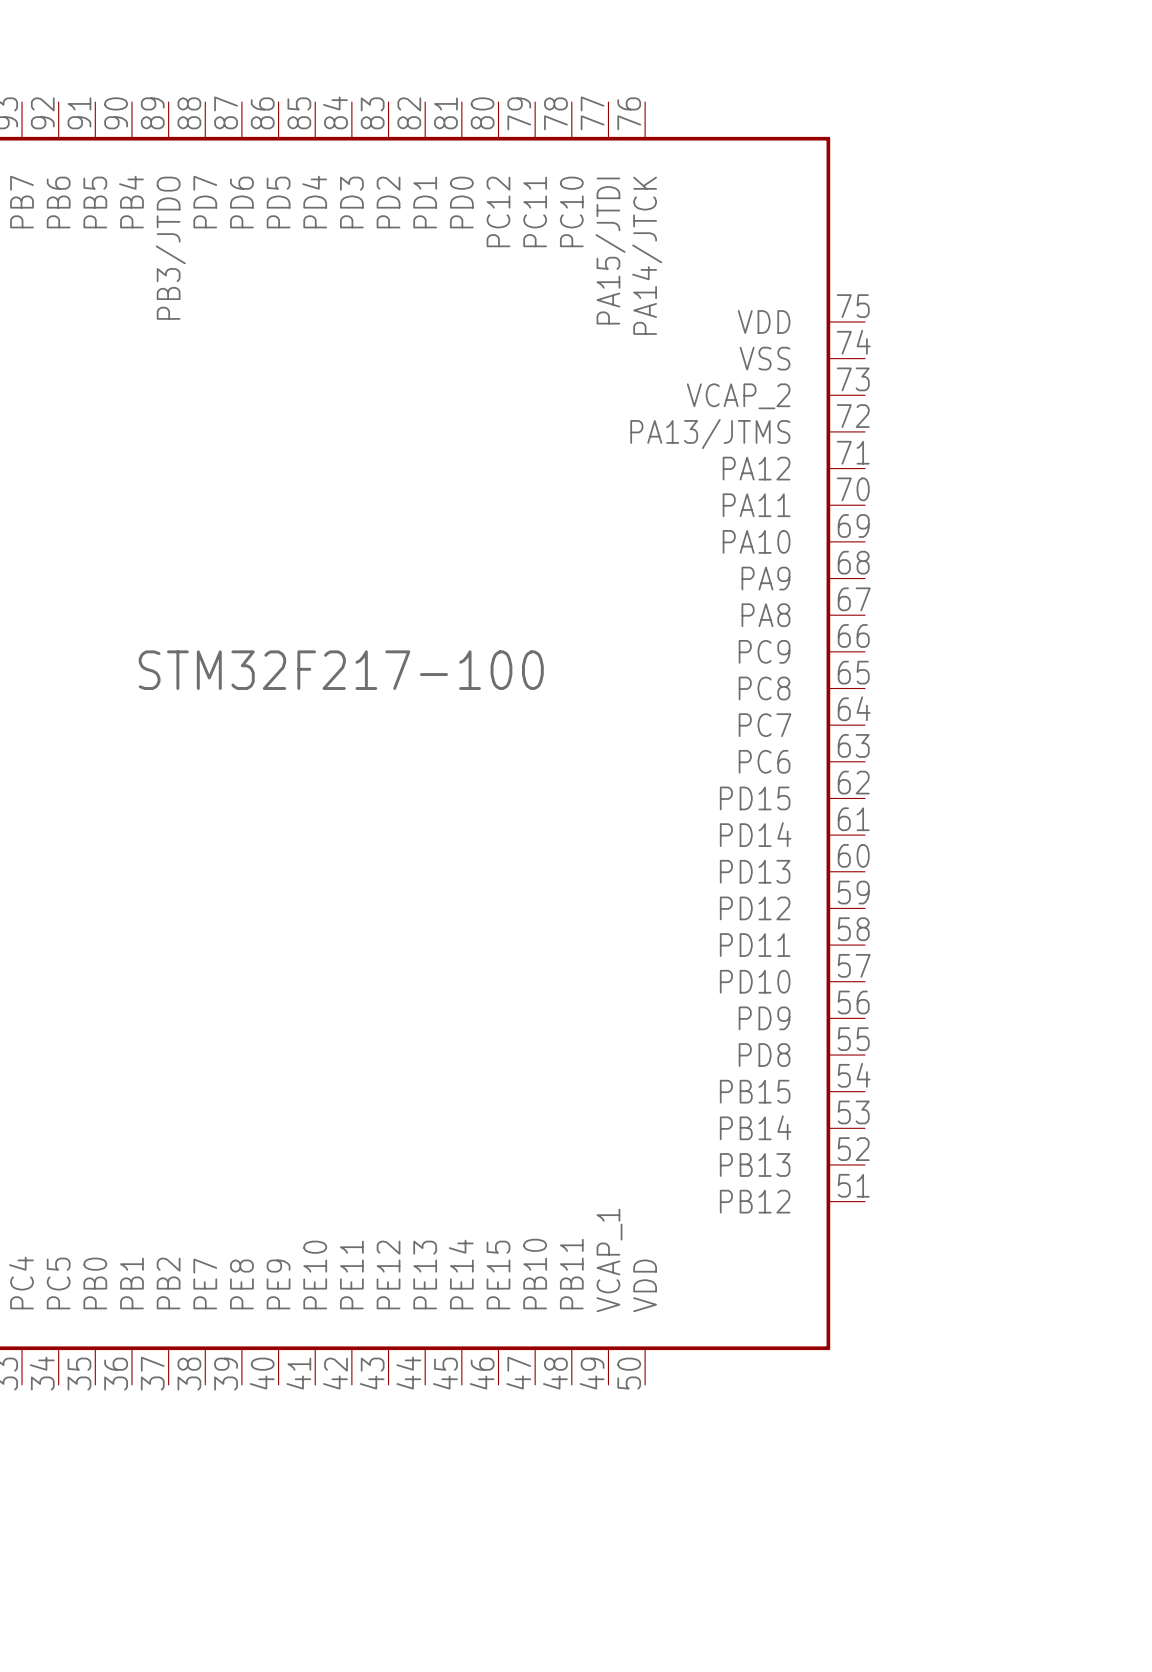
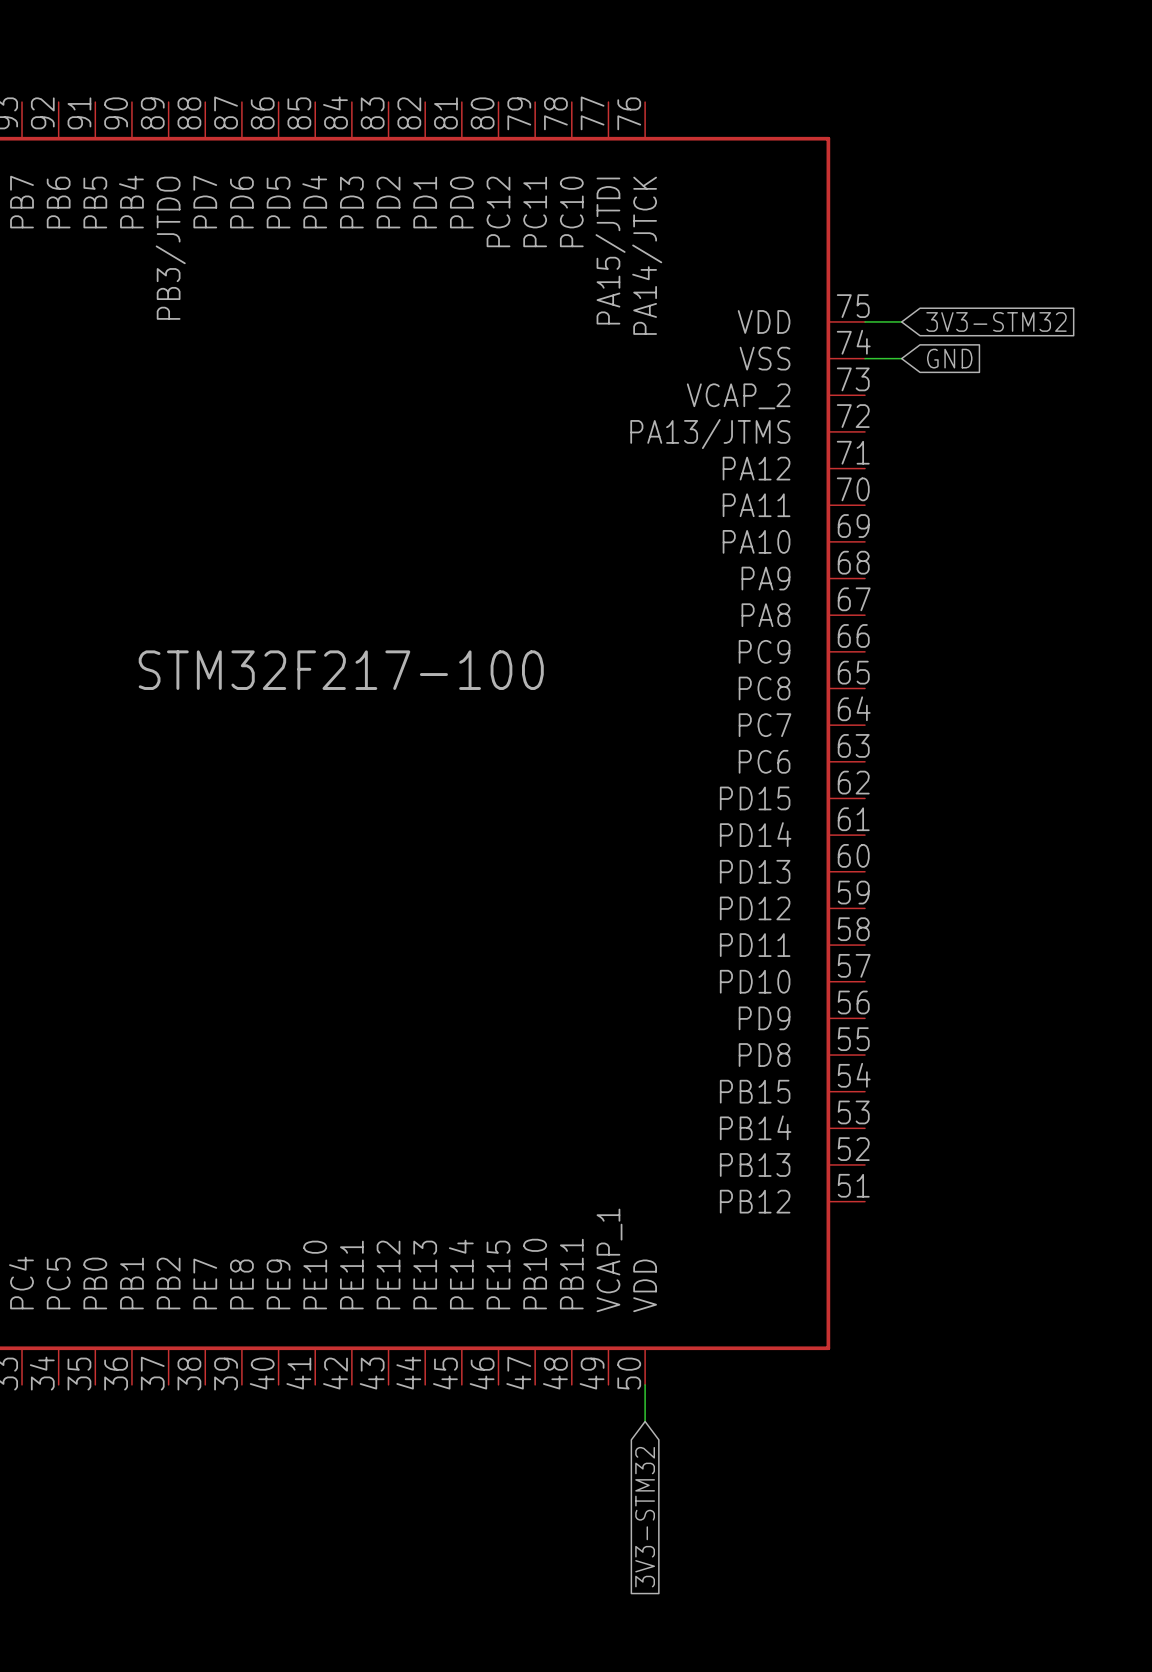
wire: none -> (865, 321) (901, 321)
global label: none -> 3V3-STM32 (996, 321)
wire: none -> (865, 358) (901, 358)
global label: none -> GND (949, 358)
wire: none -> (645, 1384) (645, 1421)
global label: none -> 3V3-STM32 (645, 1517)

